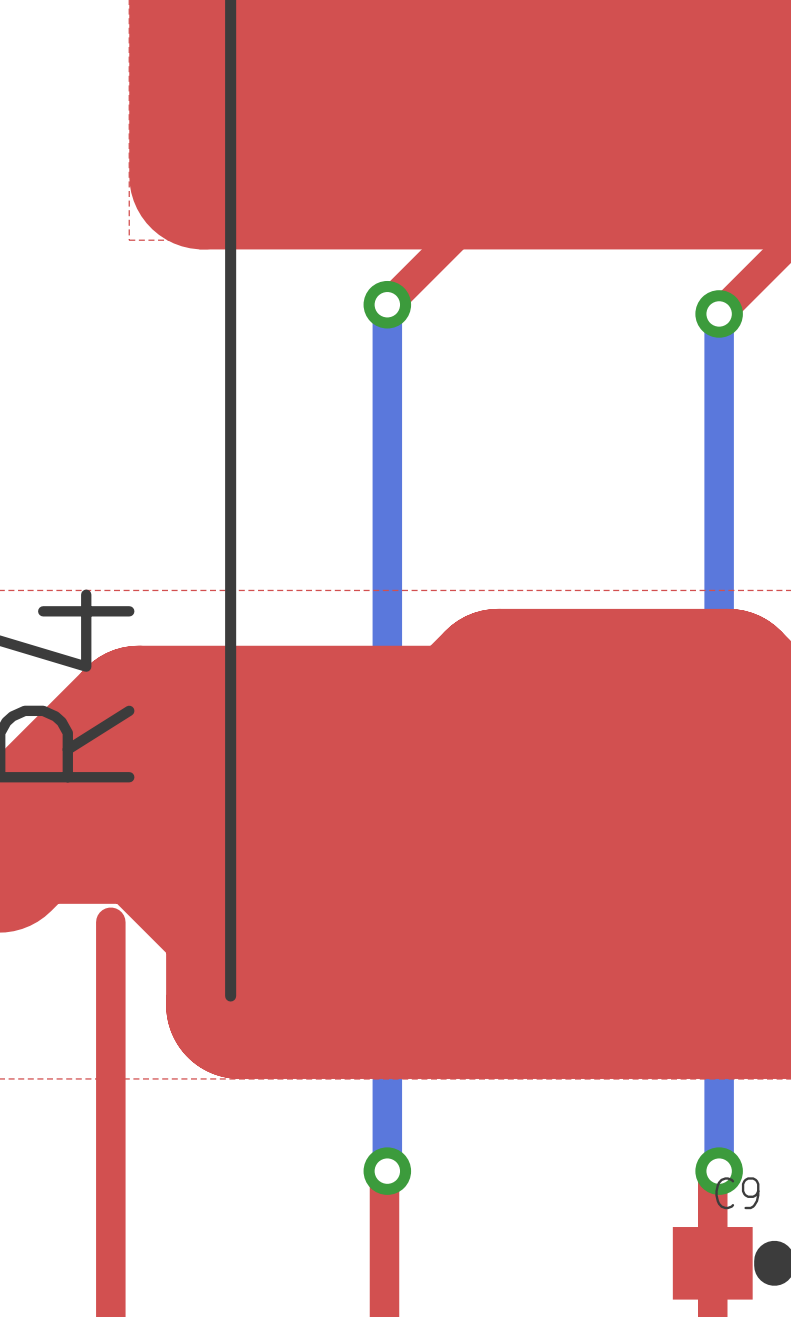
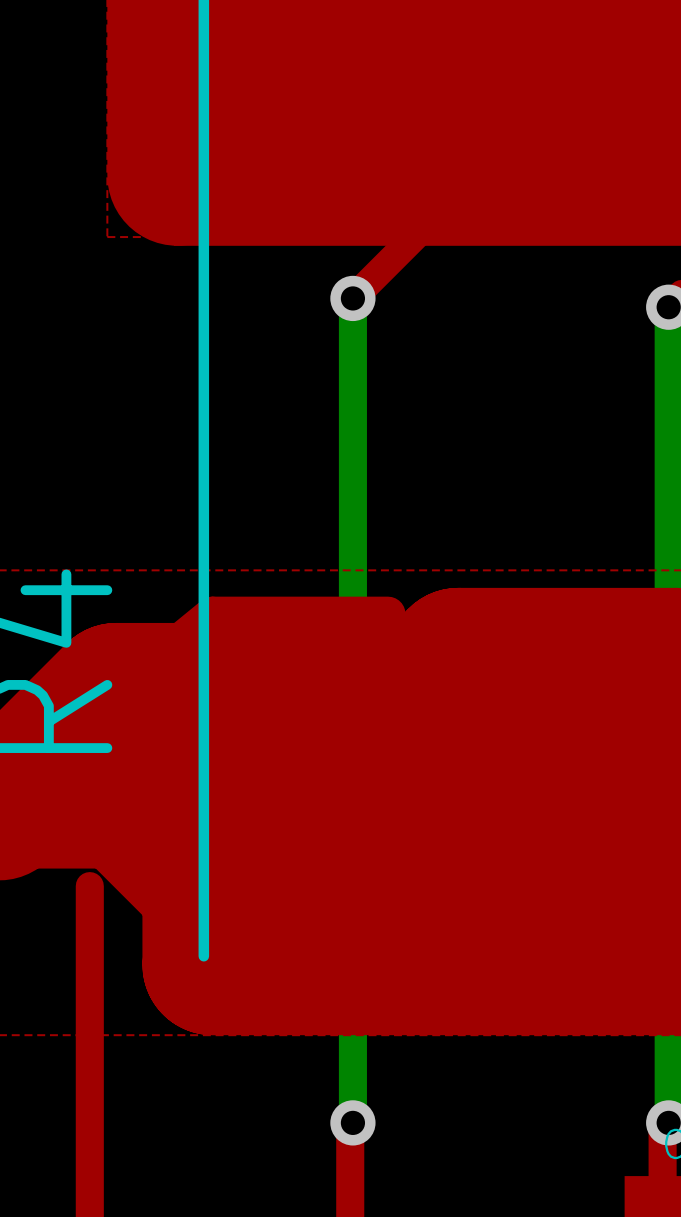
top track: none -> (388, 614) (212, 614) (116, 693)

